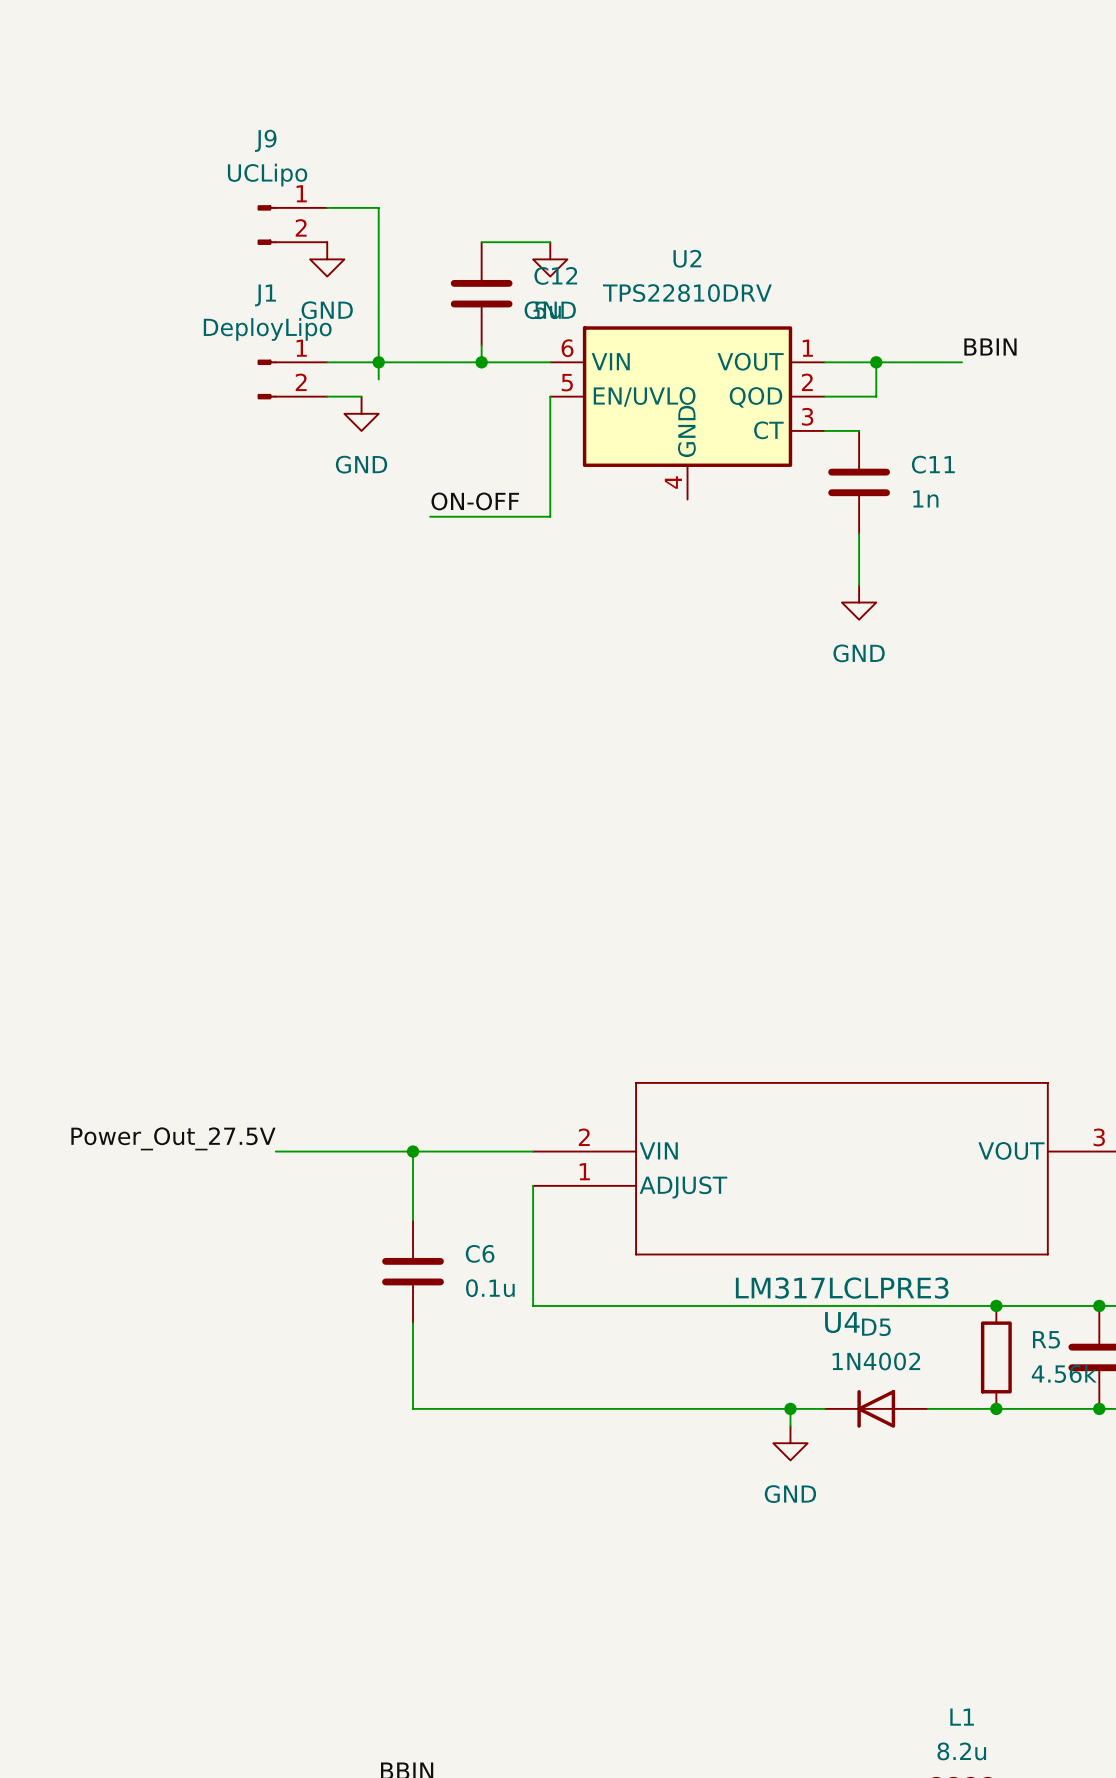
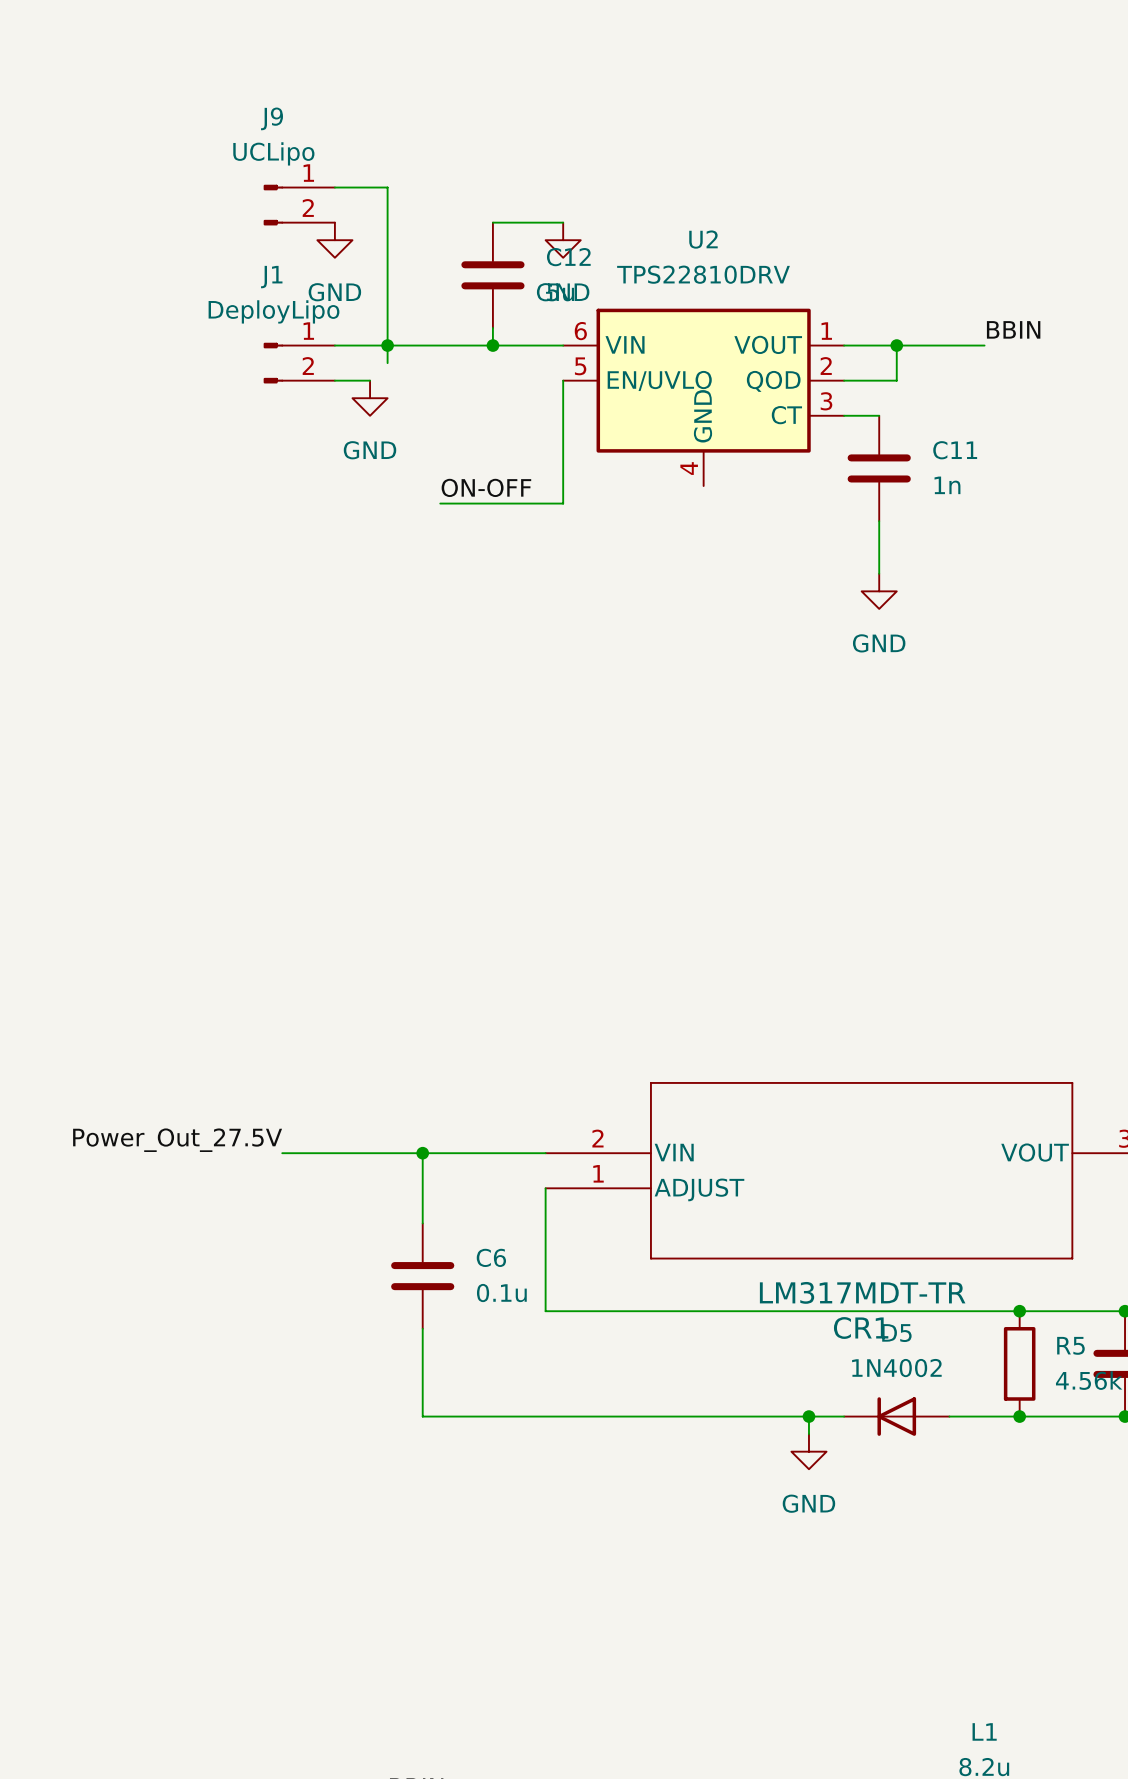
U4 value: LM317LCLPRE3 (842, 1288) -> LM317MDT-TR (862, 1292)
U4 name: U4 (842, 1322) -> CR1 (861, 1328)

